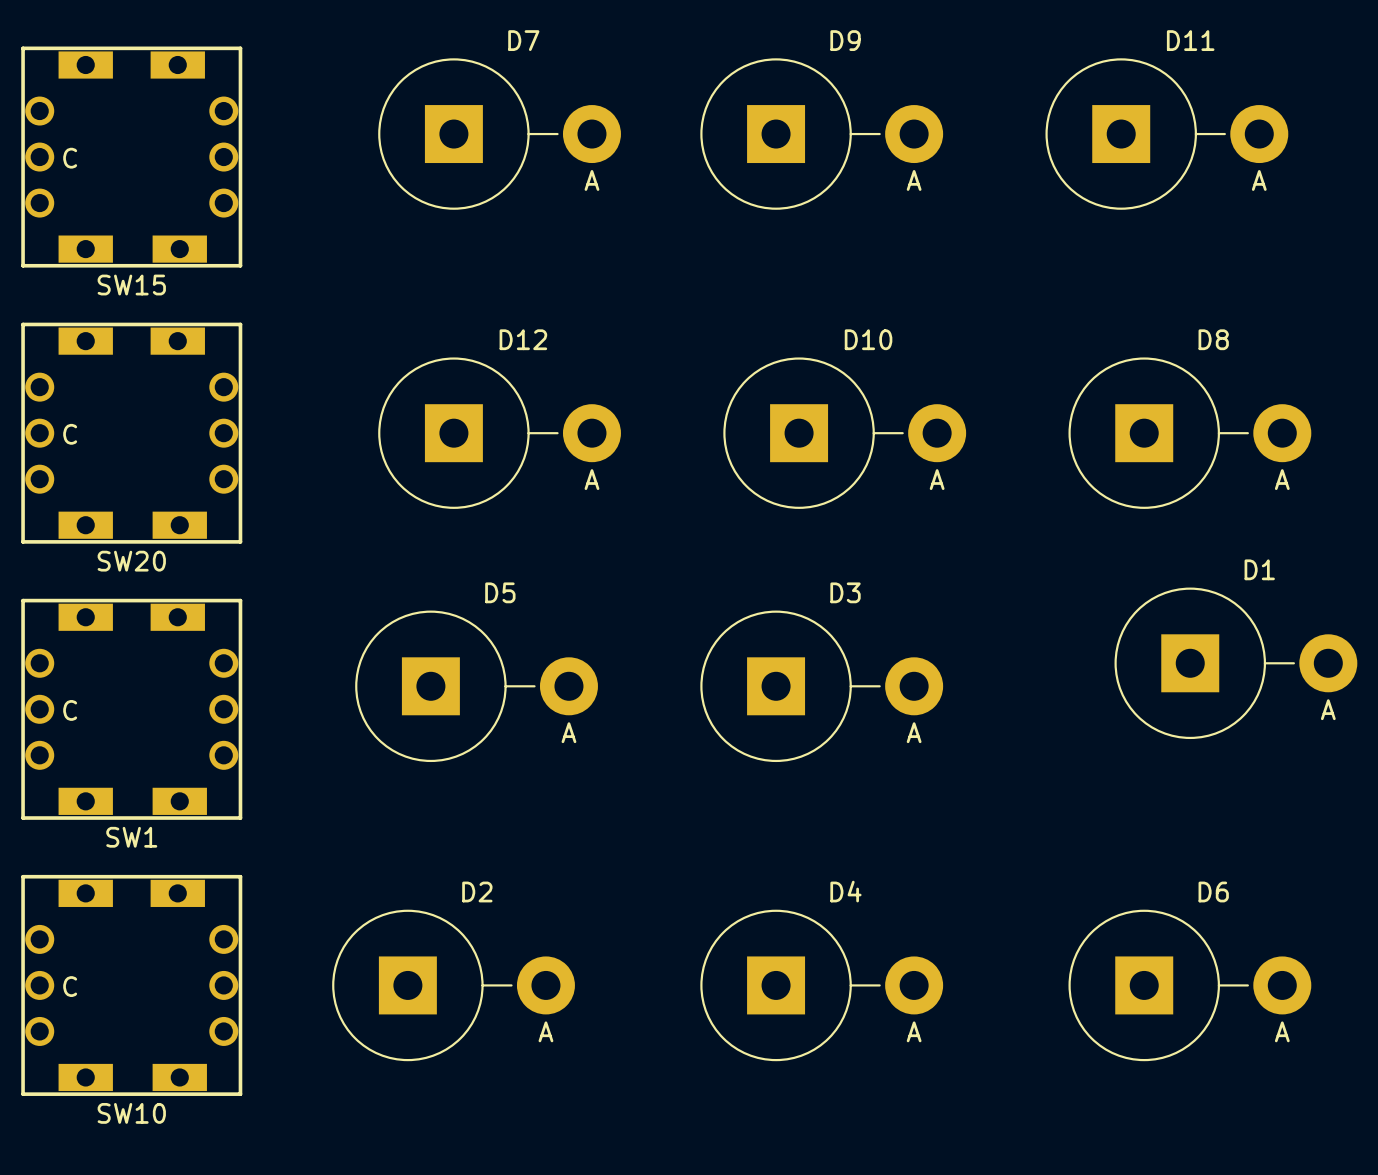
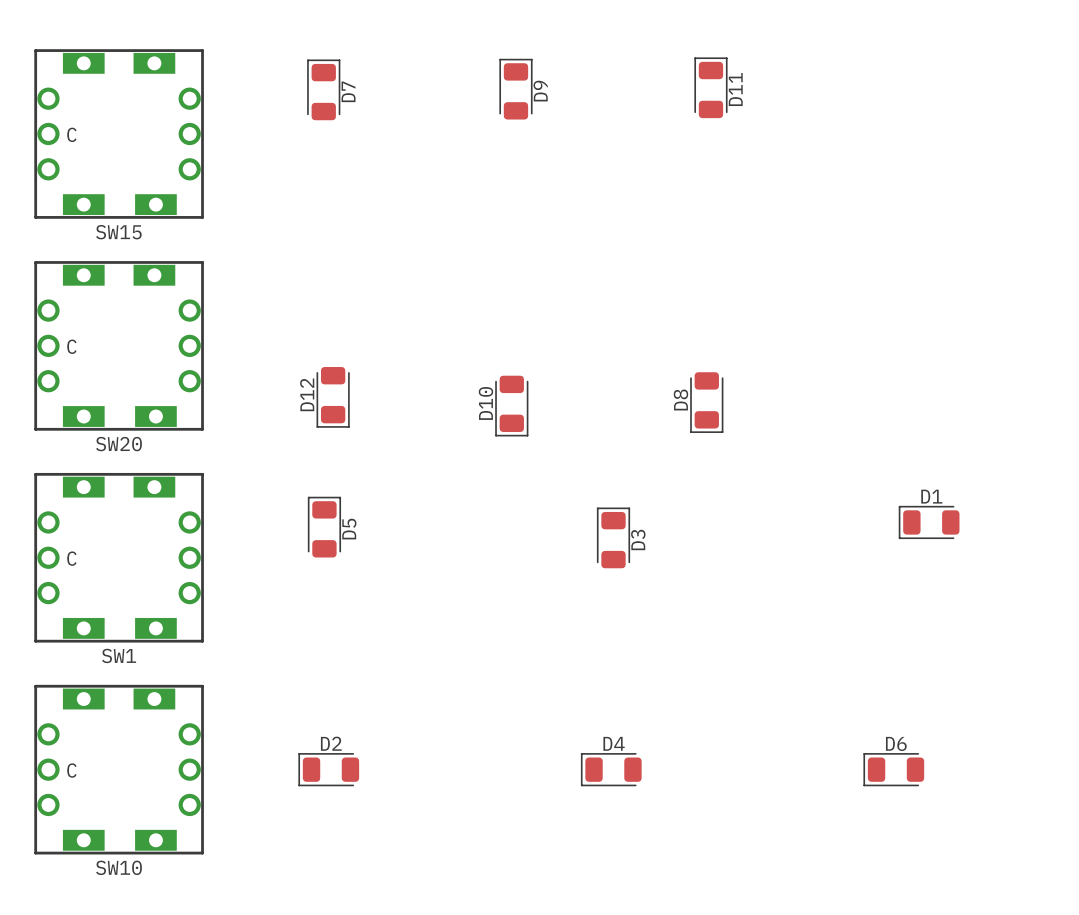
D7 name position: D7 (523, 40) -> D7 (348, 91)
D9 name position: D9 (845, 40) -> D9 (540, 91)
D11 name position: D11 (1190, 40) -> D11 (735, 89)
D7 footprint: [378, 58, 621, 210] -> [307, 59, 341, 121]
D9 footprint: [700, 58, 944, 210] -> [499, 58, 533, 120]
D11 footprint: [1045, 58, 1289, 210] -> [694, 57, 728, 119]
D12 name position: D12 (523, 339) -> D12 (307, 394)
D10 name position: D10 (868, 339) -> D10 (485, 403)
D8 name position: D8 (1213, 339) -> D8 (680, 399)
D12 footprint: [378, 357, 621, 509] -> [316, 367, 350, 428]
D10 footprint: [723, 357, 967, 509] -> [495, 375, 529, 437]
D8 footprint: [1068, 357, 1312, 509] -> [690, 372, 724, 433]
D1 name position: D1 (1259, 569) -> D1 (931, 496)
D1 footprint: [1114, 587, 1358, 740] -> [898, 505, 960, 540]
D5 name position: D5 (500, 592) -> D5 (349, 529)
D3 name position: D3 (845, 592) -> D3 (638, 539)
D5 footprint: [355, 610, 598, 763] -> [307, 496, 342, 558]
D3 footprint: [700, 610, 944, 763] -> [596, 507, 631, 569]
D2 name position: D2 (477, 891) -> D2 (331, 743)
D4 name position: D4 (845, 891) -> D4 (614, 743)
D6 name position: D6 (1213, 891) -> D6 (896, 743)
D2 footprint: [332, 909, 575, 1062] -> [298, 753, 360, 787]
D4 footprint: [700, 909, 944, 1062] -> [580, 753, 642, 787]
D6 footprint: [1068, 909, 1312, 1062] -> [863, 753, 925, 787]

